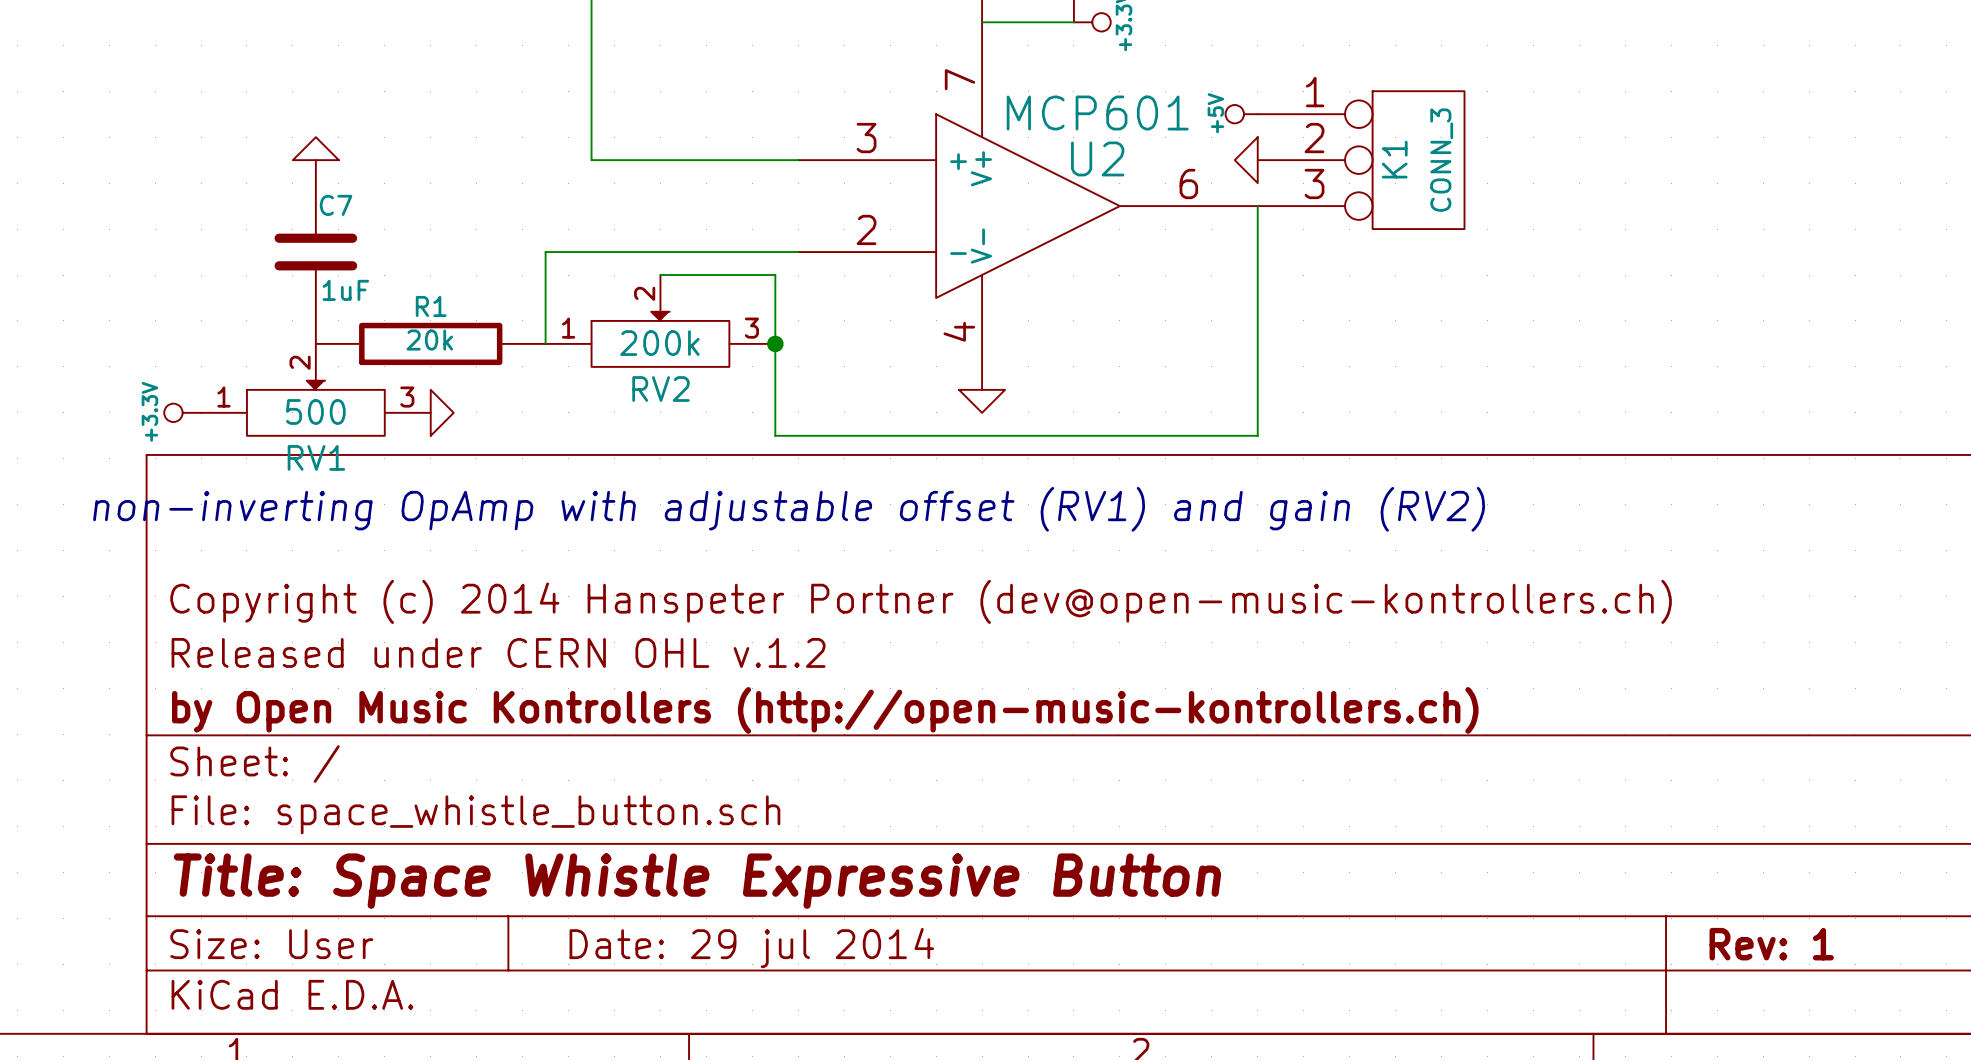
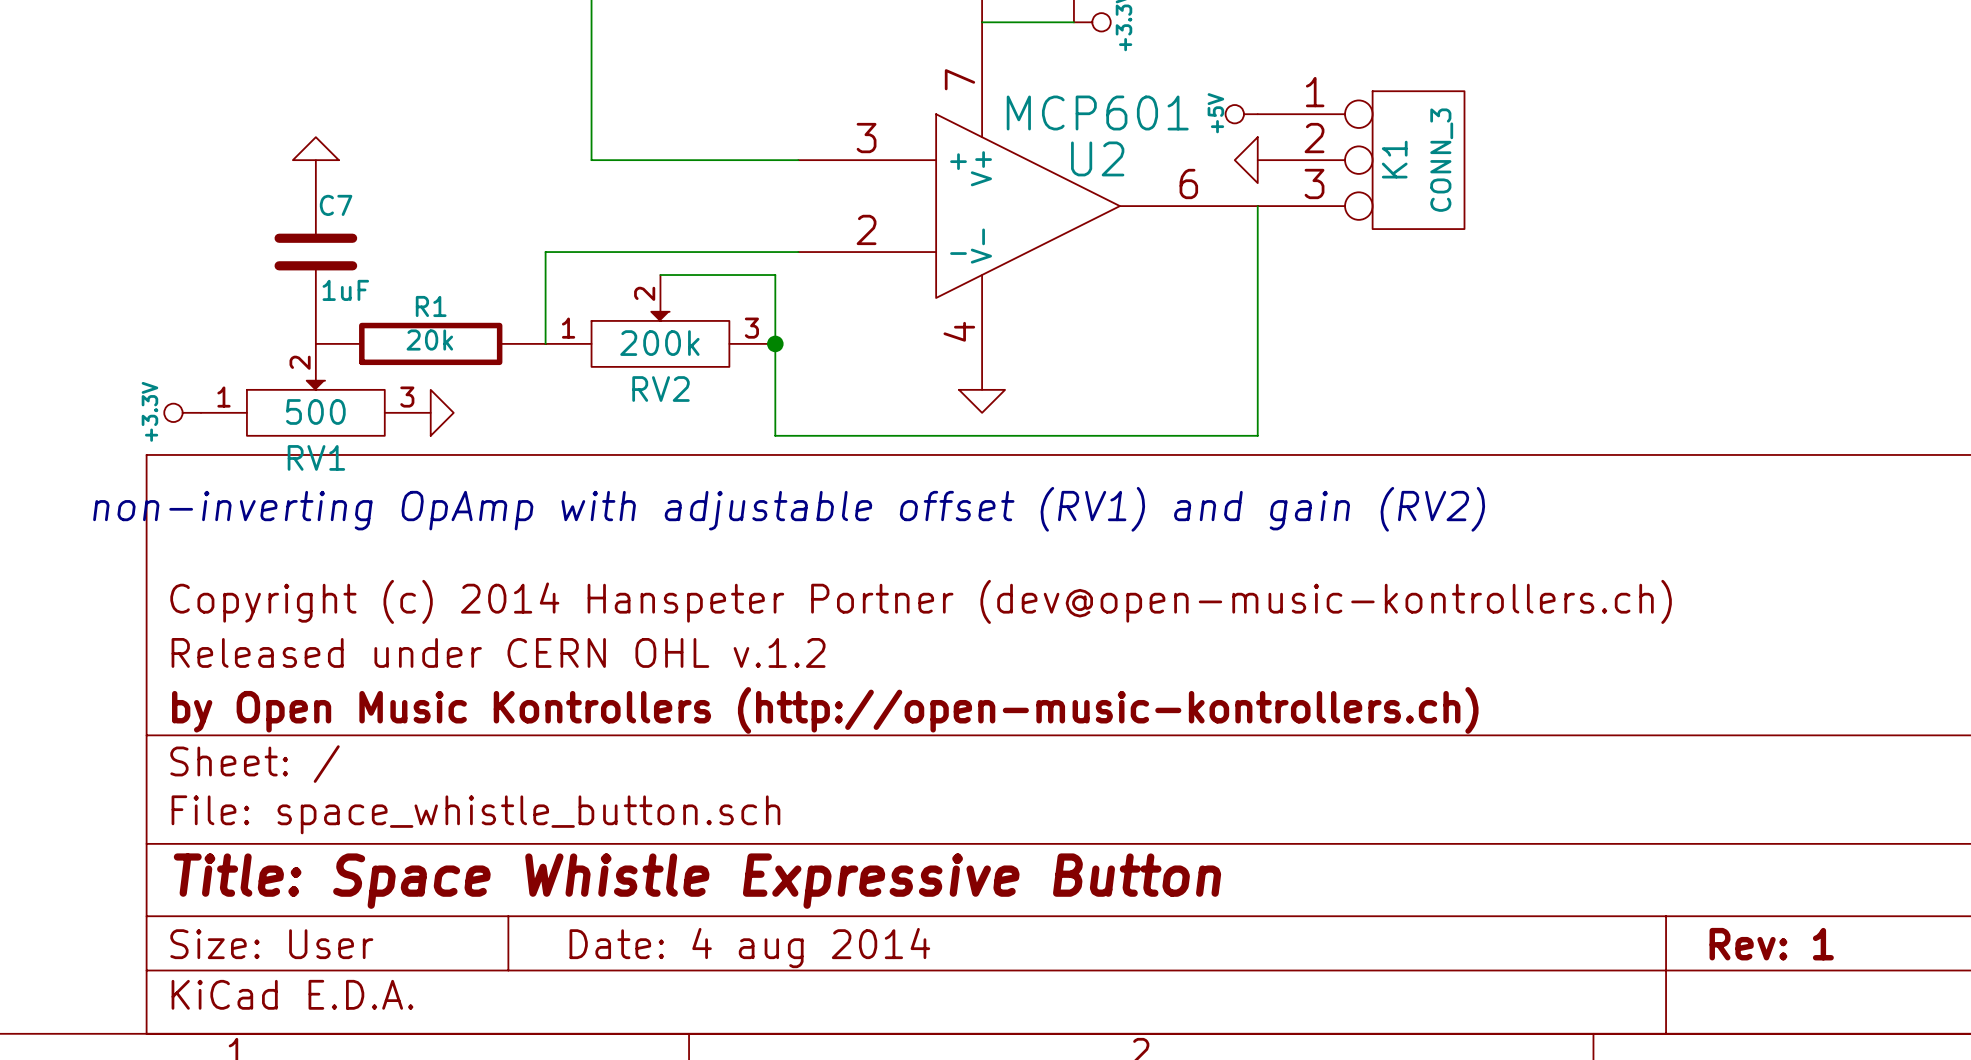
title block: Date: 29 jul 2014 (751, 948) -> Date: 4 aug 2014 (749, 948)

